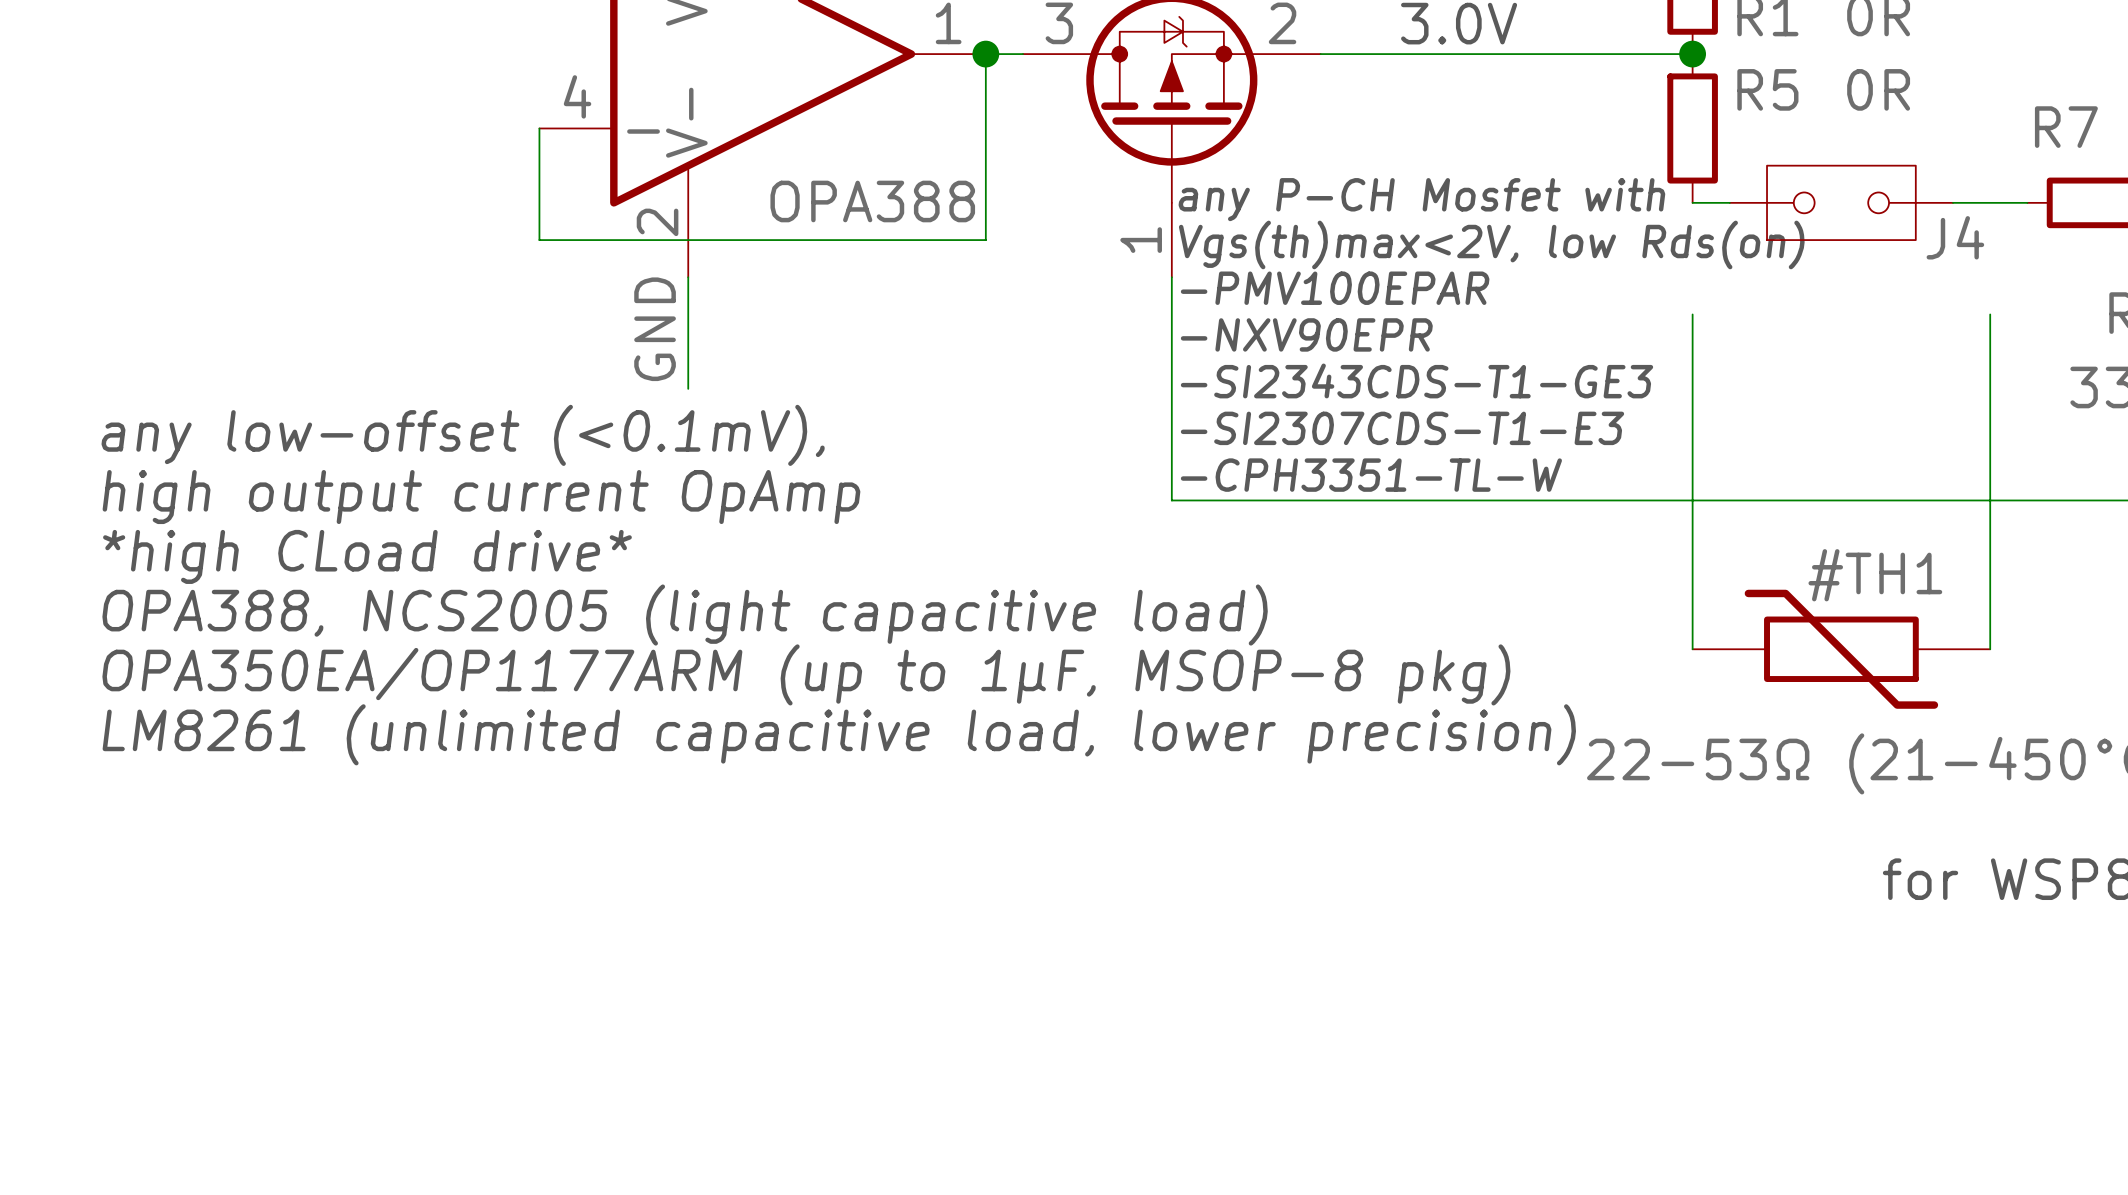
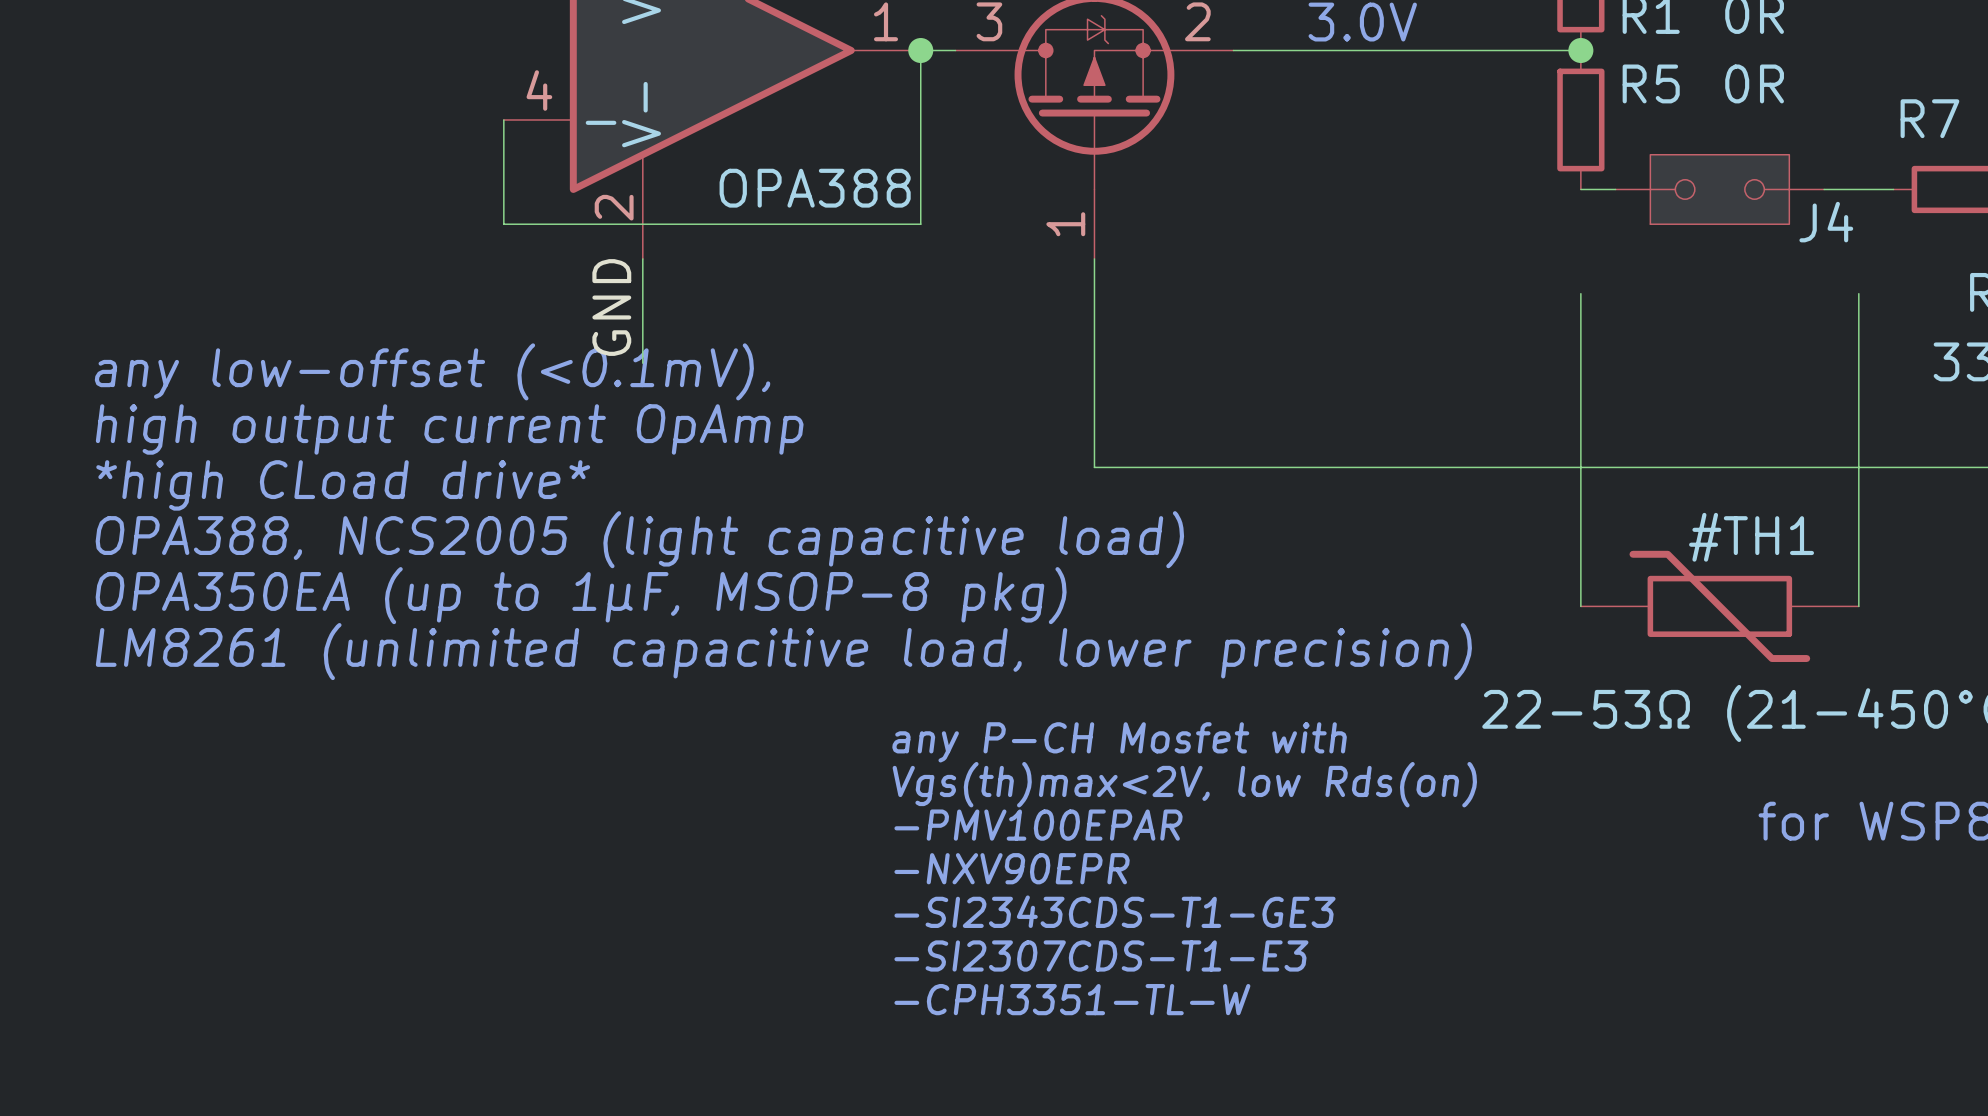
text position: any P-CH Mosfet with (1421, 199) -> any P-CH Mosfet with (1119, 742)
text position: Vgs(th)max<2V, low Rds(on) (1491, 244) -> Vgs(th)max<2V, low Rds(on) (1184, 784)
text position: -PMV100EPAR (1335, 288) -> -PMV100EPAR (1038, 825)
text position: -NXV90EPR (1306, 334) -> -NXV90EPR (1012, 868)
text position: -SI2343CDS-T1-GE3 (1416, 380) -> -SI2343CDS-T1-GE3 (1114, 911)
text position: -SI2307CDS-T1-E3 (1402, 428) -> -SI2307CDS-T1-E3 (1101, 955)
text position: any low-offset (<0.1mV), (463, 435) -> any low-offset (<0.1mV), (432, 371)
text position: -CPH3351-TL-W (1371, 475) -> -CPH3351-TL-W (1072, 999)
text position: high output current OpAmp (481, 497) -> high output current OpAmp (449, 429)
text position: *high CLoad drive* (367, 556) -> *high CLoad drive* (343, 485)
text position: OPA388, NCS2005 (light capacitive load) (685, 615) -> OPA388, NCS2005 (light capacitive load) (639, 539)
text: OPA350EA/OP1177ARM (up to 1µF, MSOP-8 pkg) (806, 674) -> OPA350EA (up to 1µF, MSOP-8 pkg) (581, 595)
text position: LM8261 (unlimited capacitive load, lower precision) (839, 734) -> LM8261 (unlimited capacitive load, lower precision) (783, 651)

